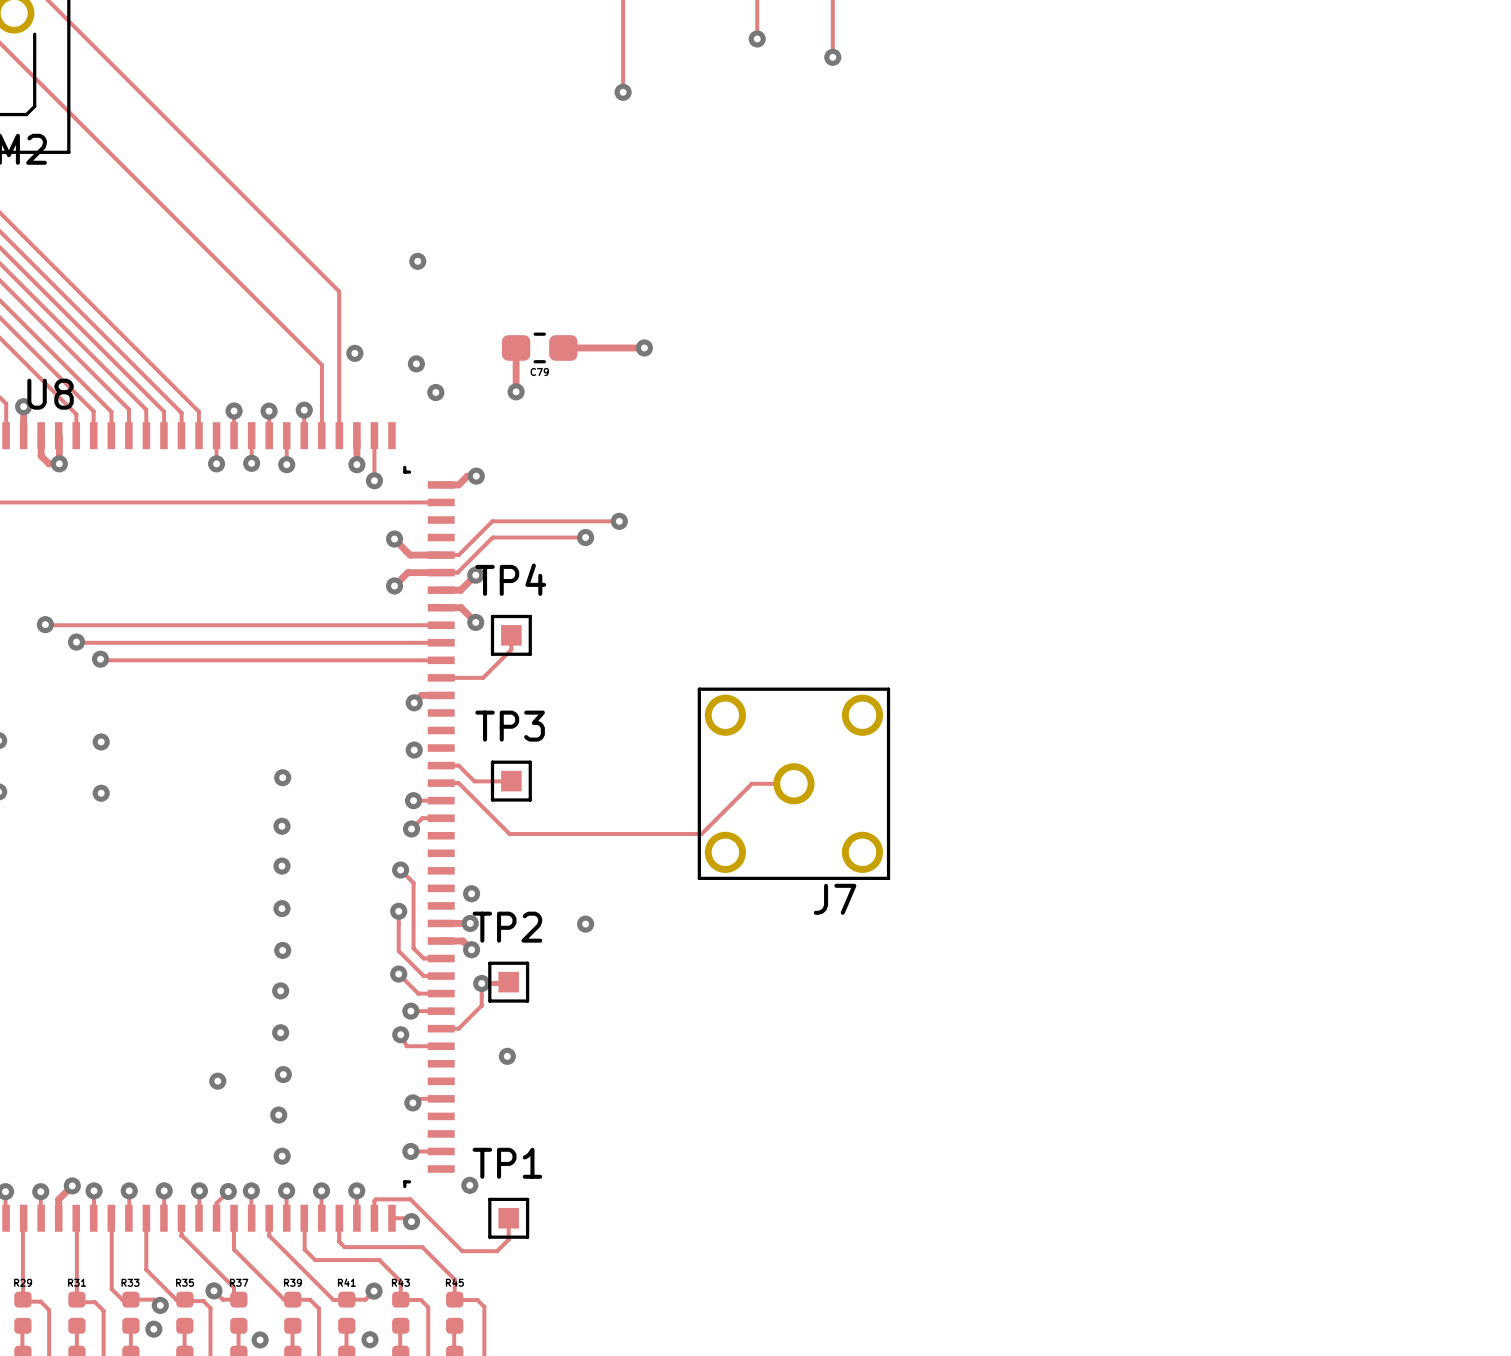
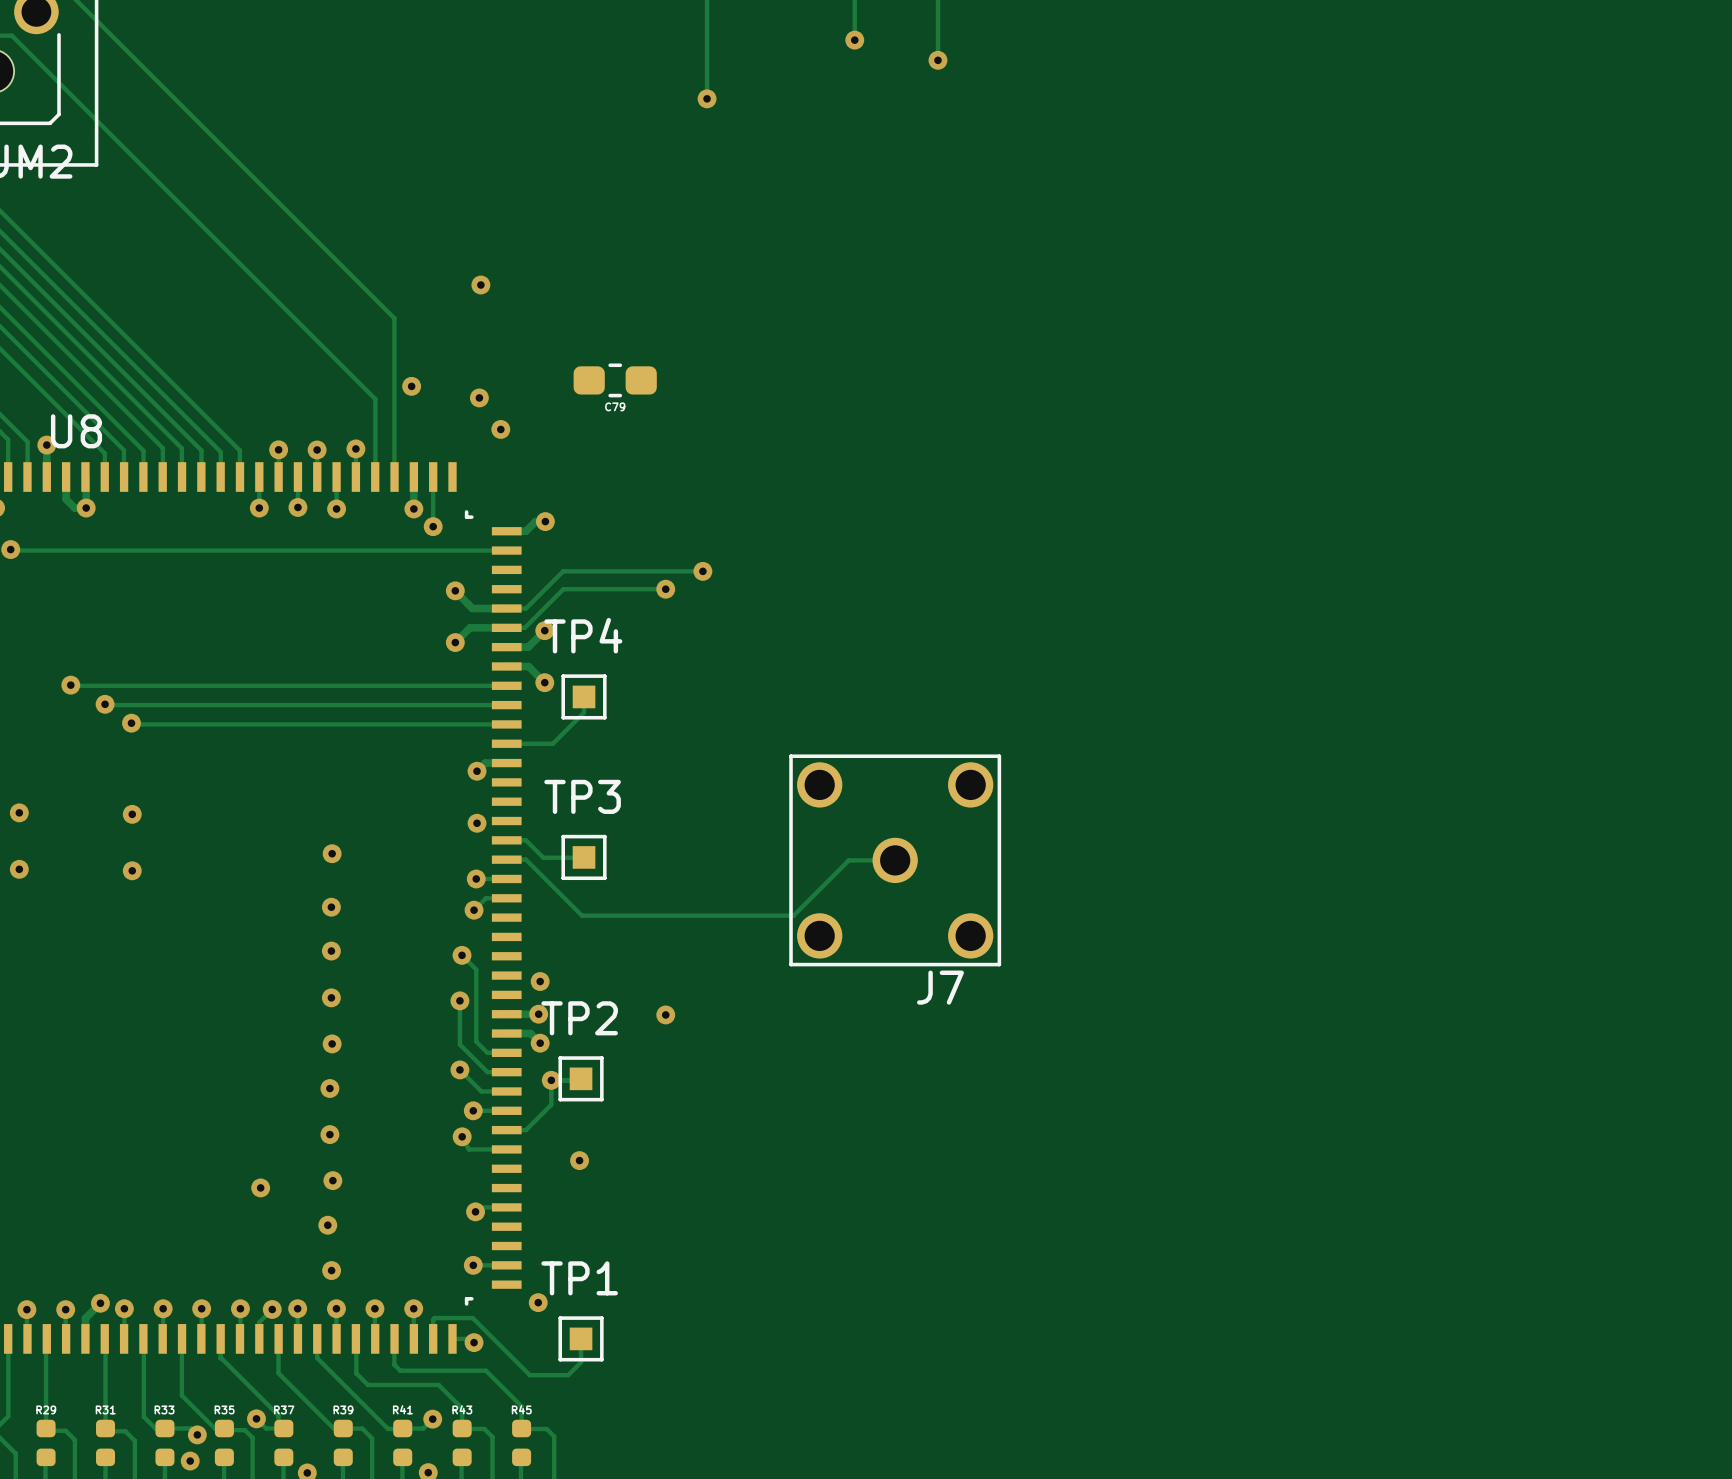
track: (516, 347) (516, 391) -> none
track: (563, 347) (644, 347) -> none
via: (644, 347) -> none
via: (516, 391) -> none

